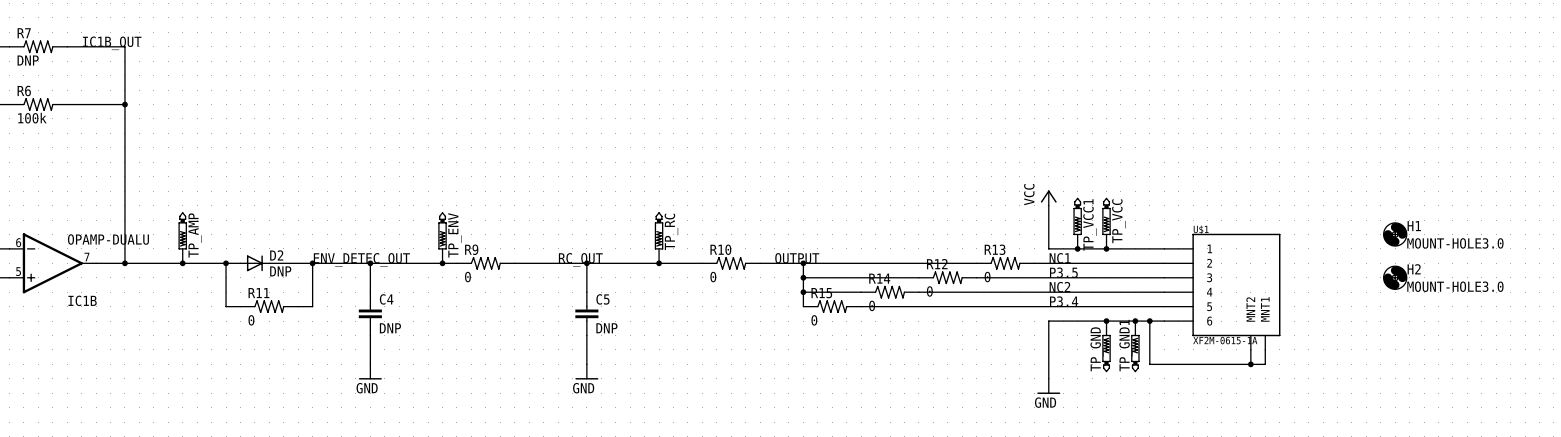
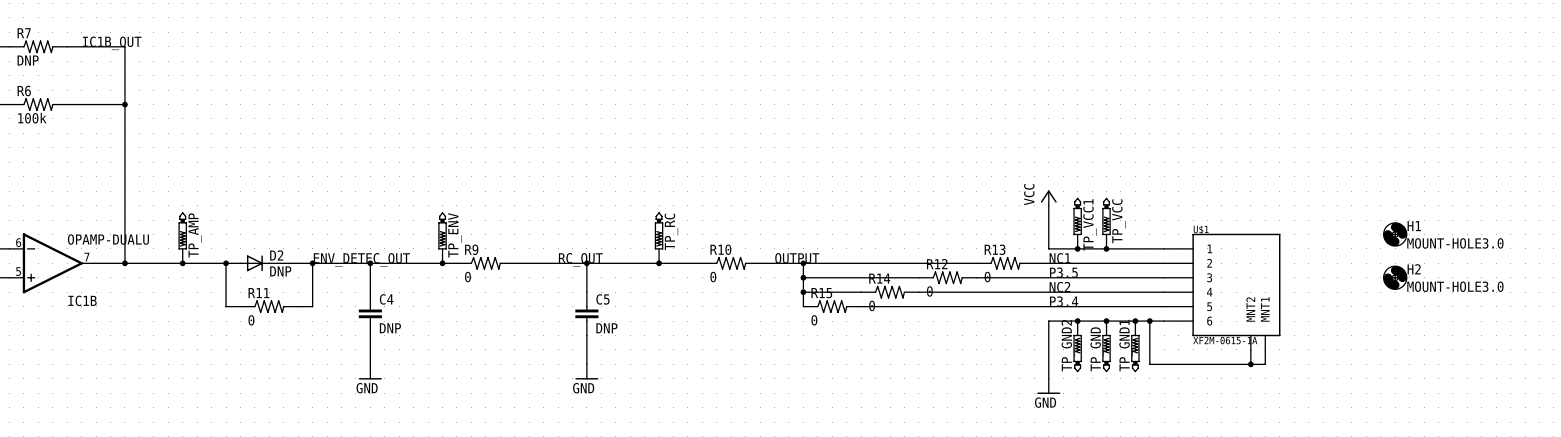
junction: none -> (1077, 321)
TP_GND2: none -> (1077, 346)

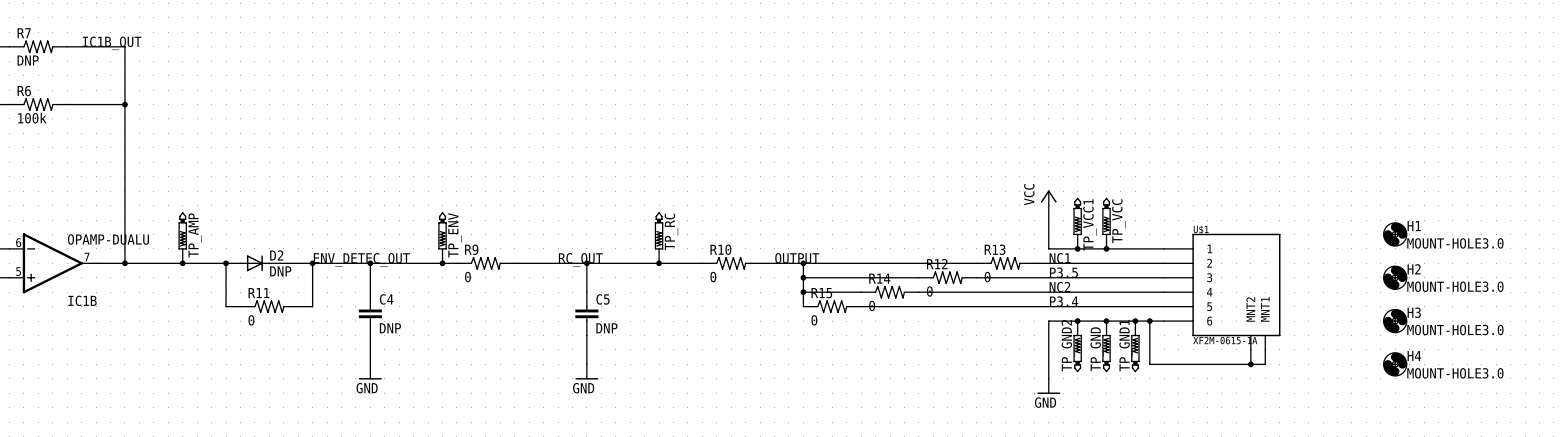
H3: none -> MOUNT-HOLE3.0 (1395, 321)
H4: none -> MOUNT-HOLE3.0 (1395, 364)

